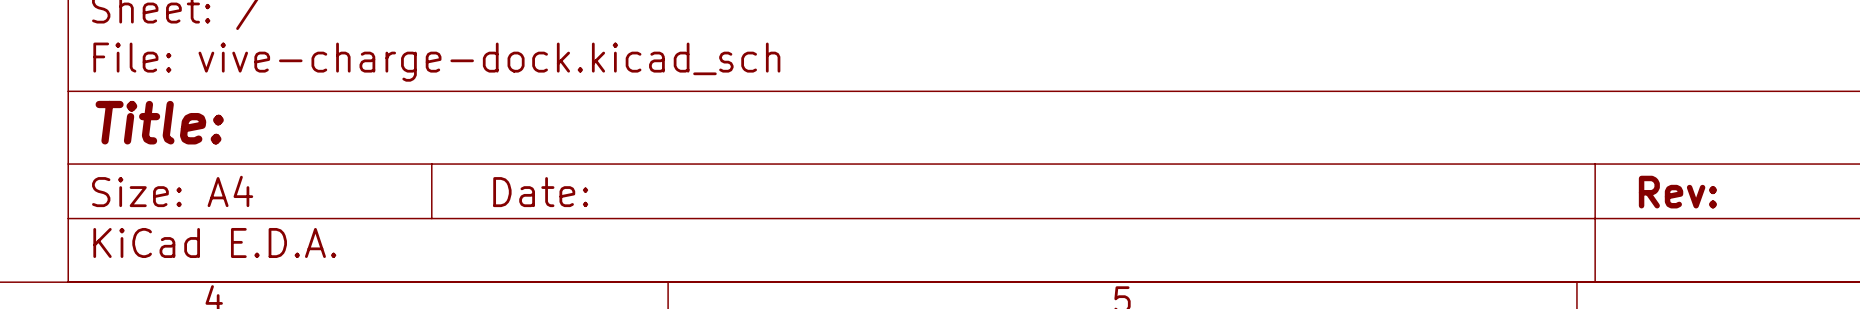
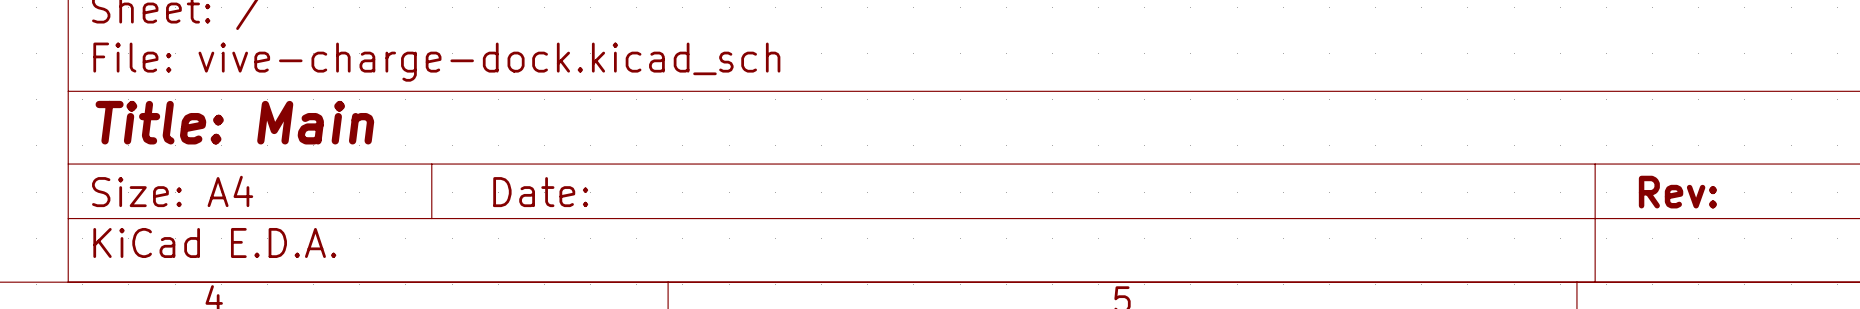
title block: Title: (159, 122) -> Title: Main (234, 122)

